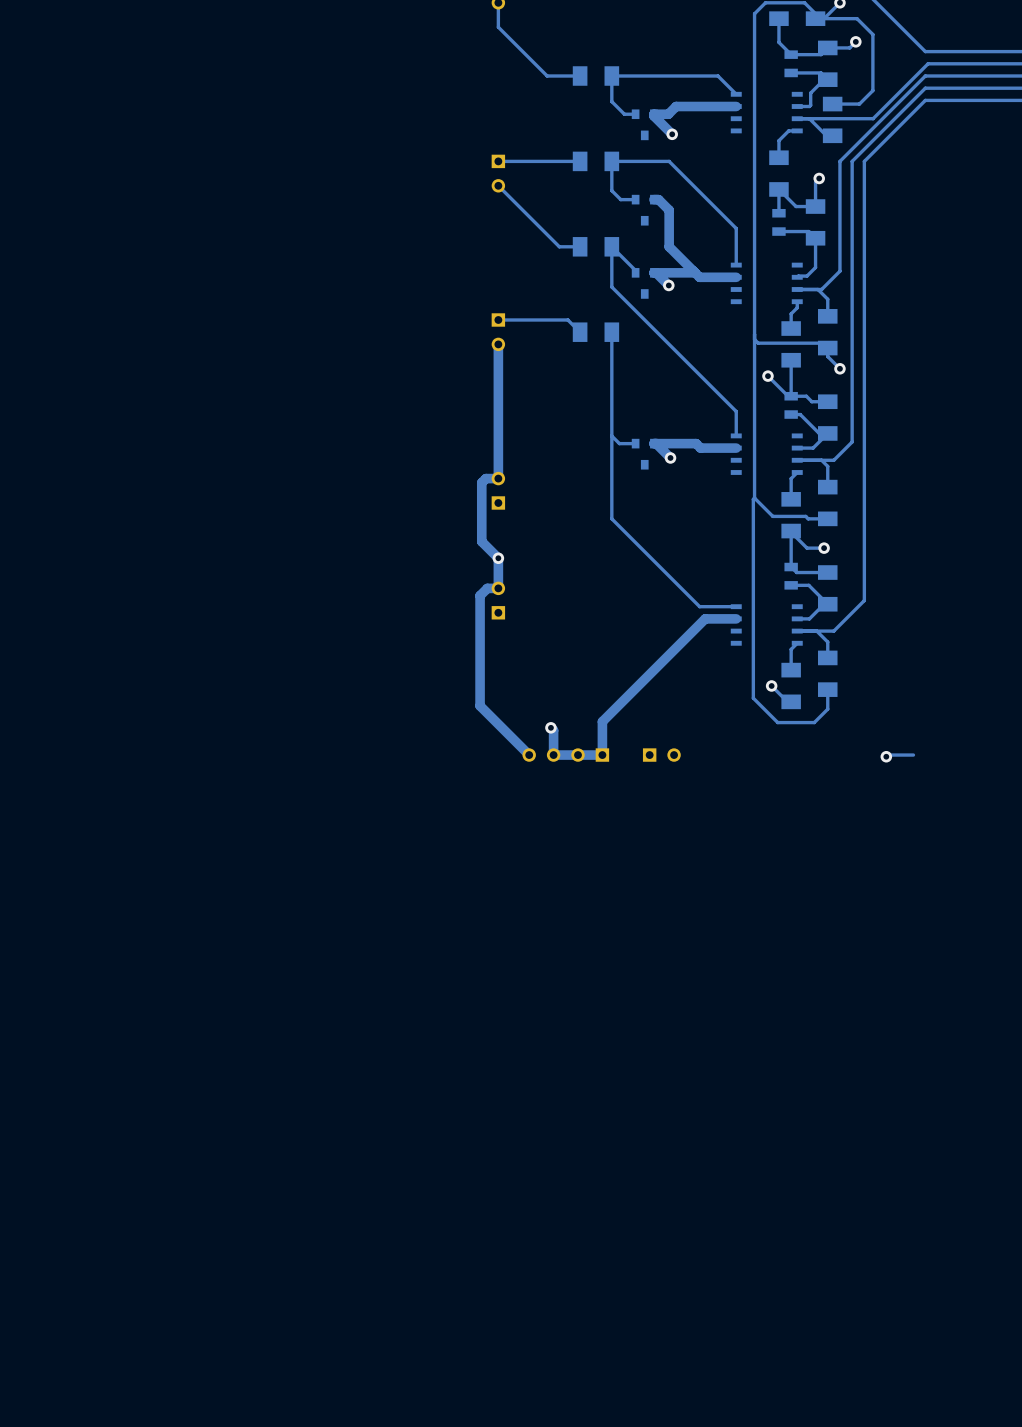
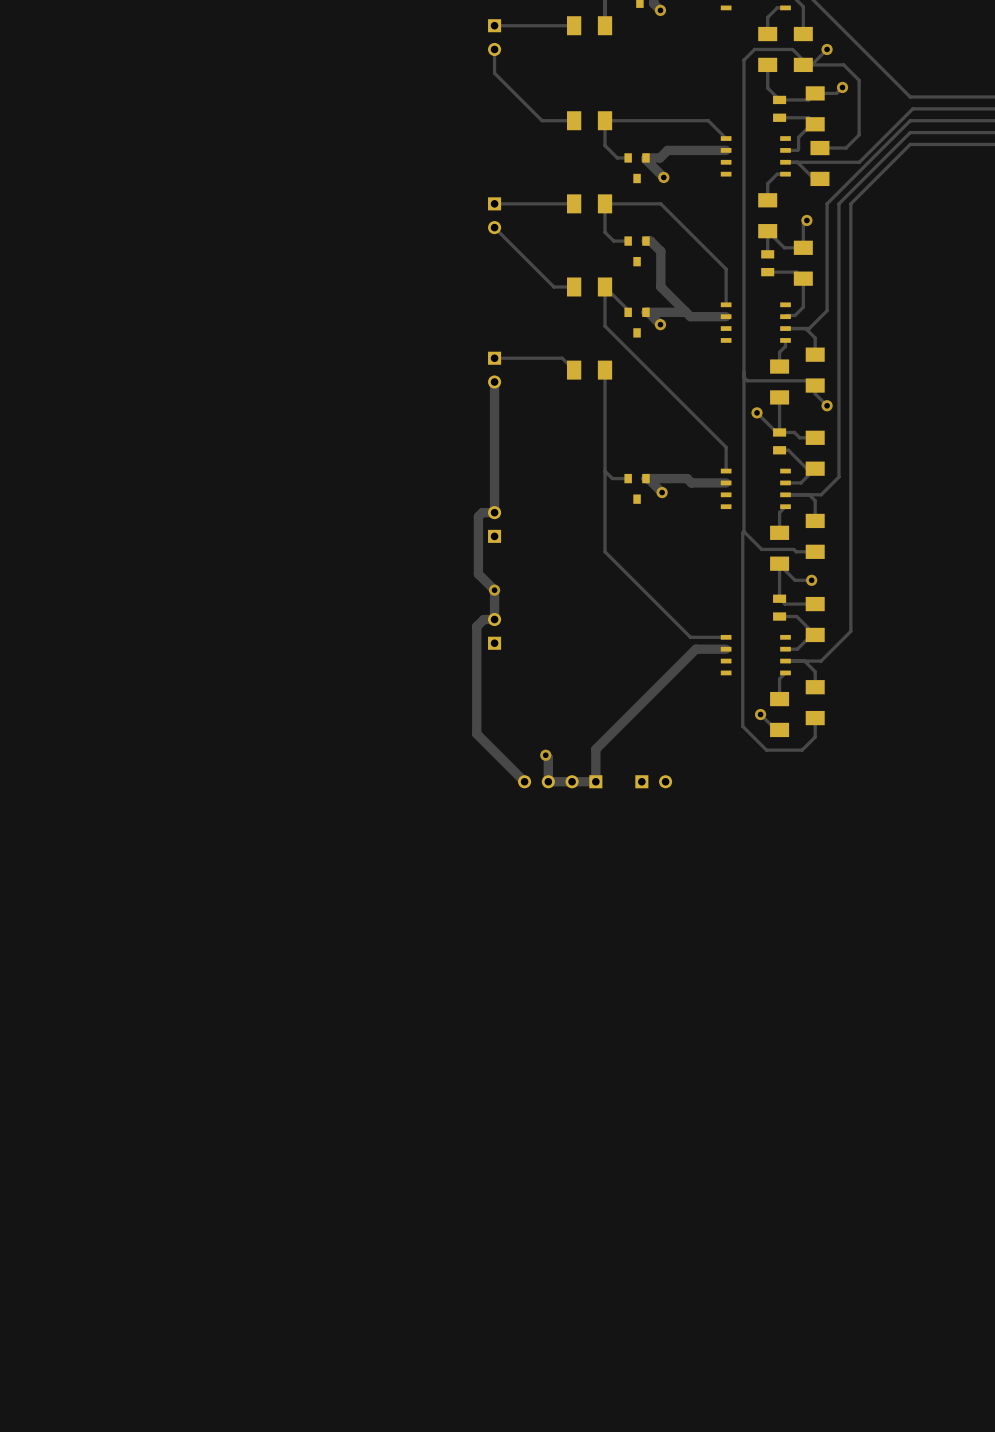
track: (913, 755) (888, 755) (886, 756) -> none
via: (886, 756) -> none

